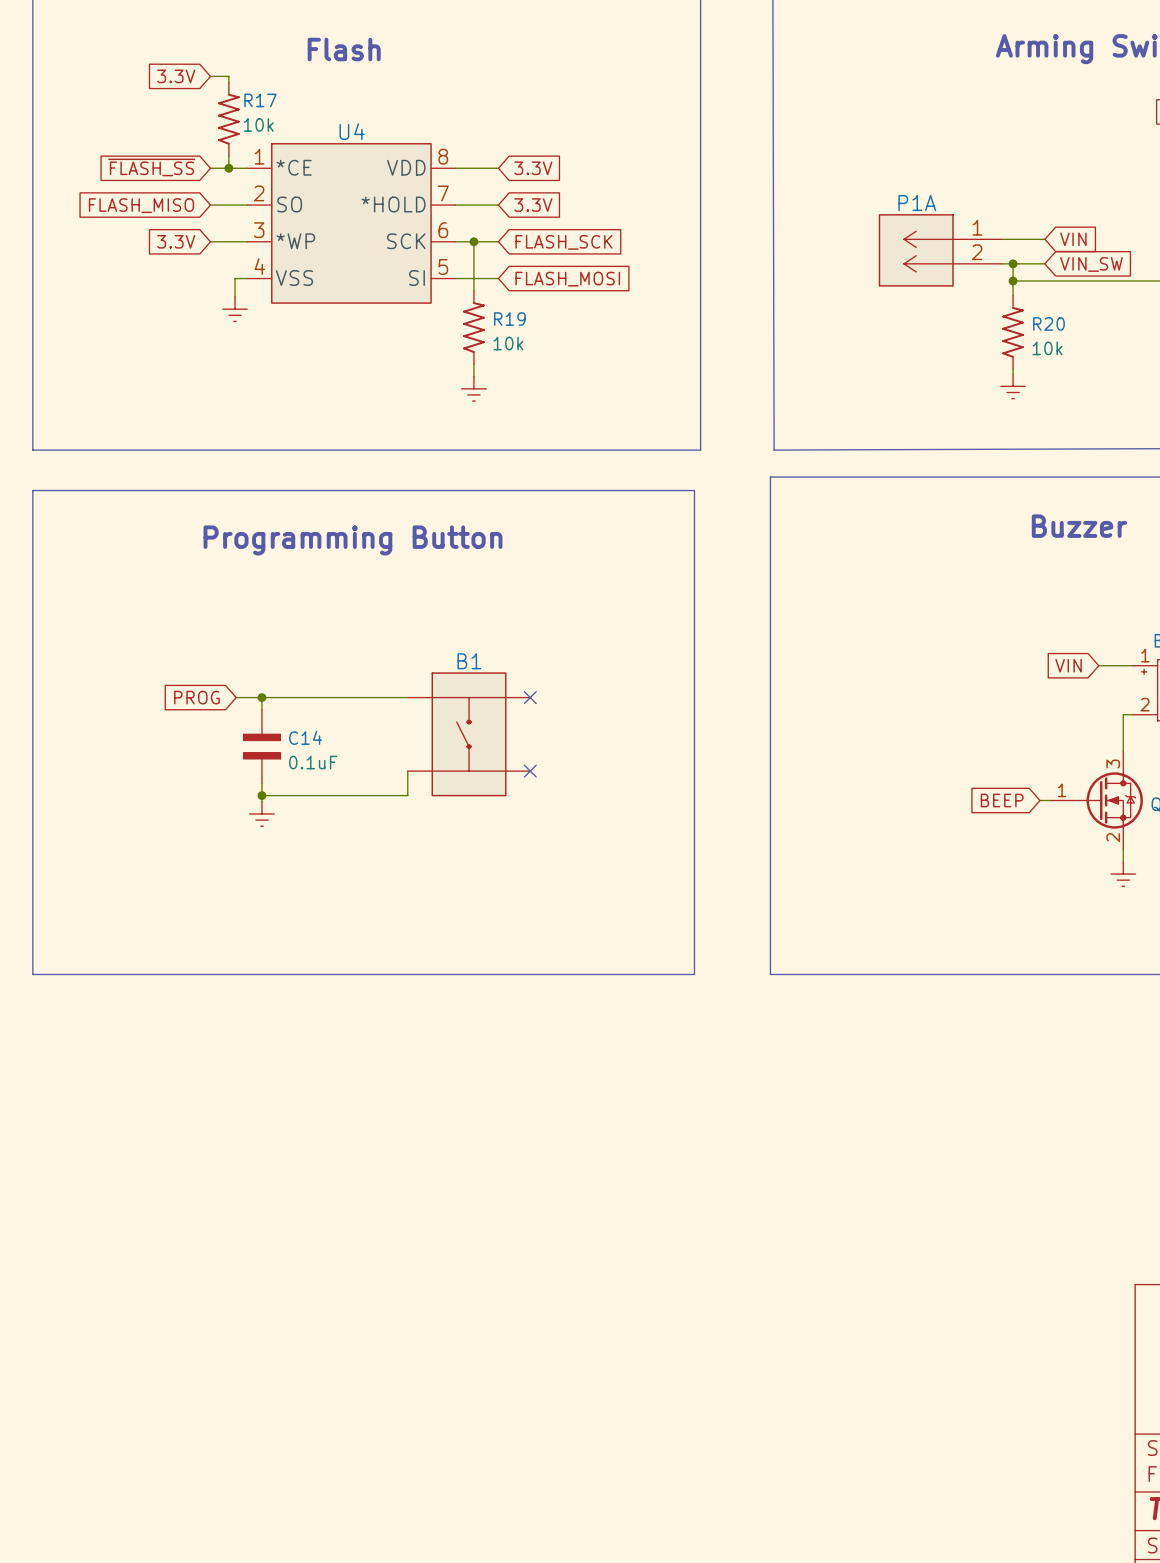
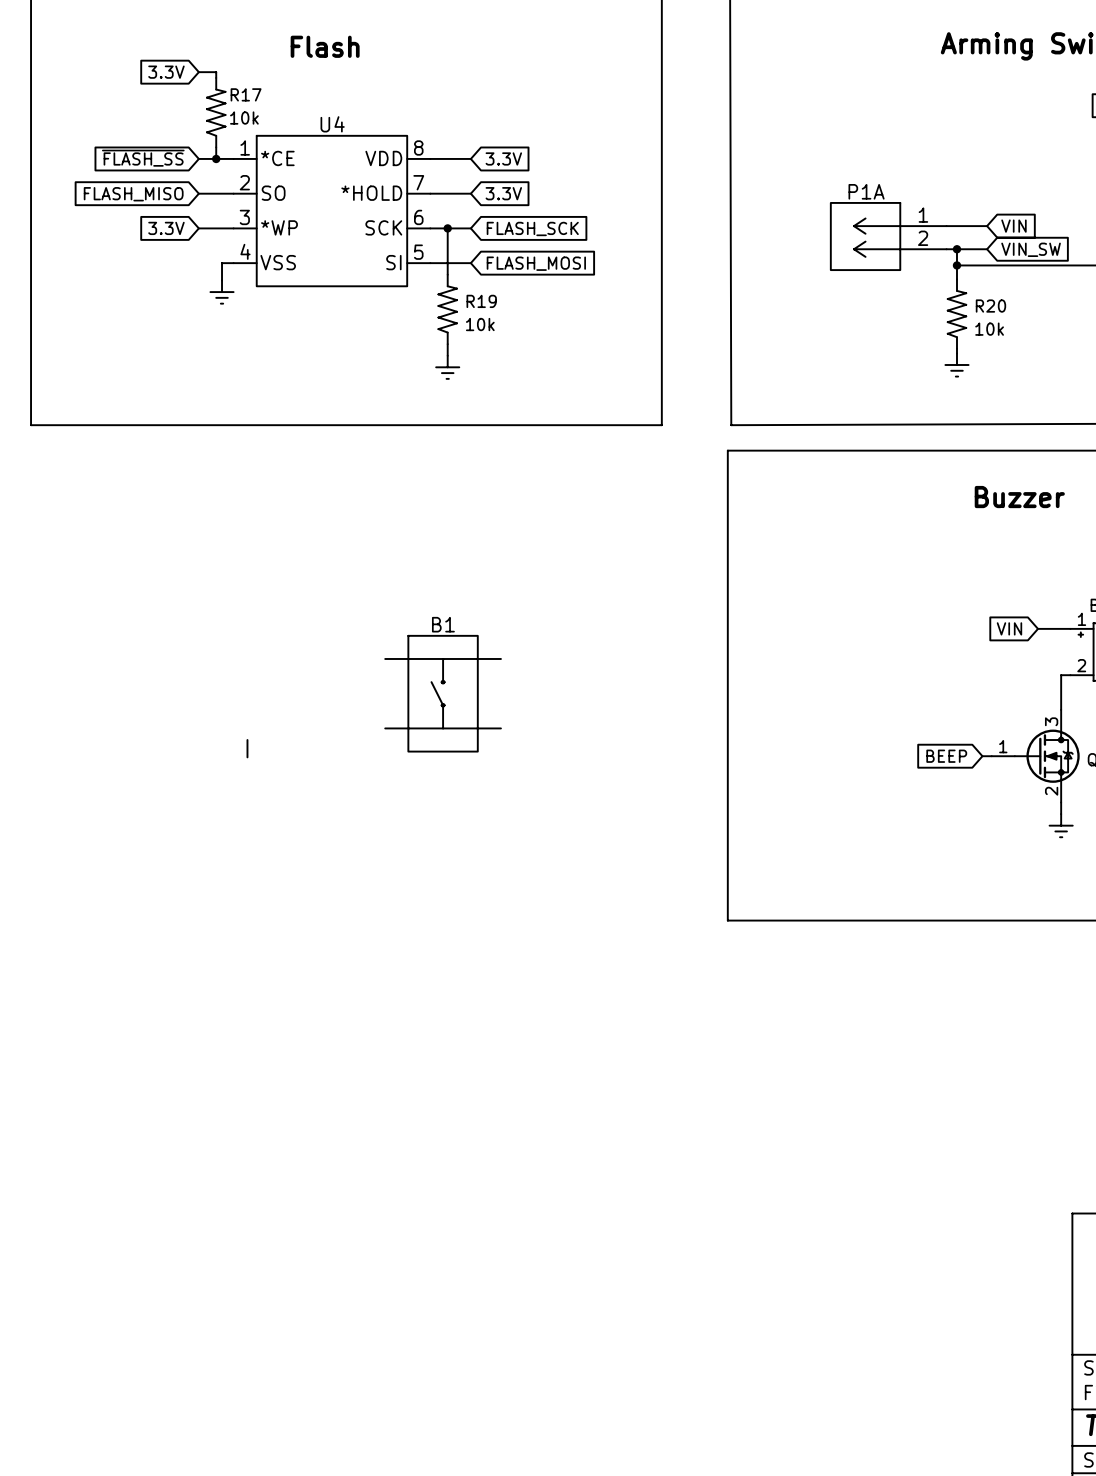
line: (32, 490) (32, 974) (694, 974) (694, 490) (32, 490) -> none
text: Programming Button (352, 540) -> none
global label: PROG (196, 697) -> none
wire: (236, 697) (407, 697) -> none
wire: (261, 697) (261, 709) -> none
junction: (261, 697) -> none
no-connect mark: (530, 697) -> none
C14: 0.1uF (261, 746) -> none
wire: (407, 771) (407, 795) (261, 795) -> none
no-connect mark: (530, 771) -> none
junction: (261, 795) -> none
power symbol: (261, 813) -> none

